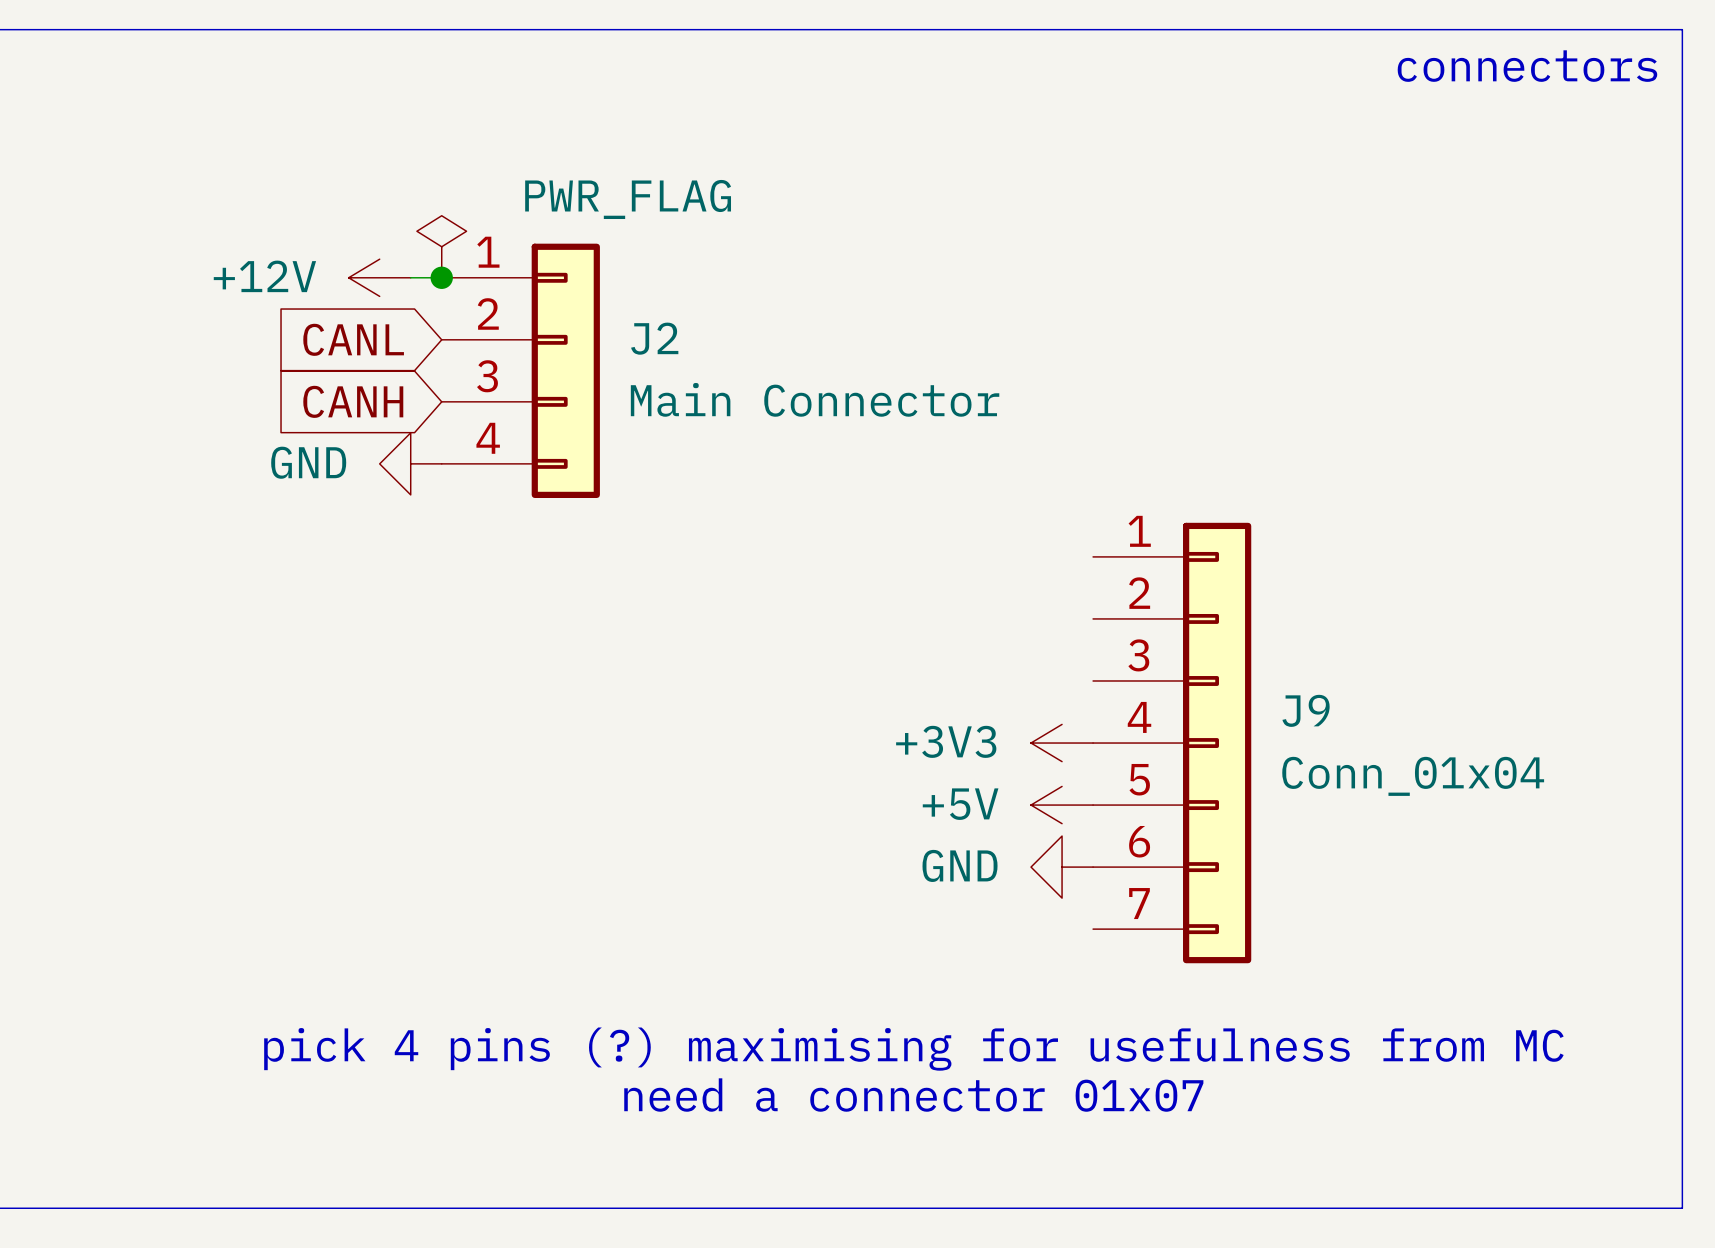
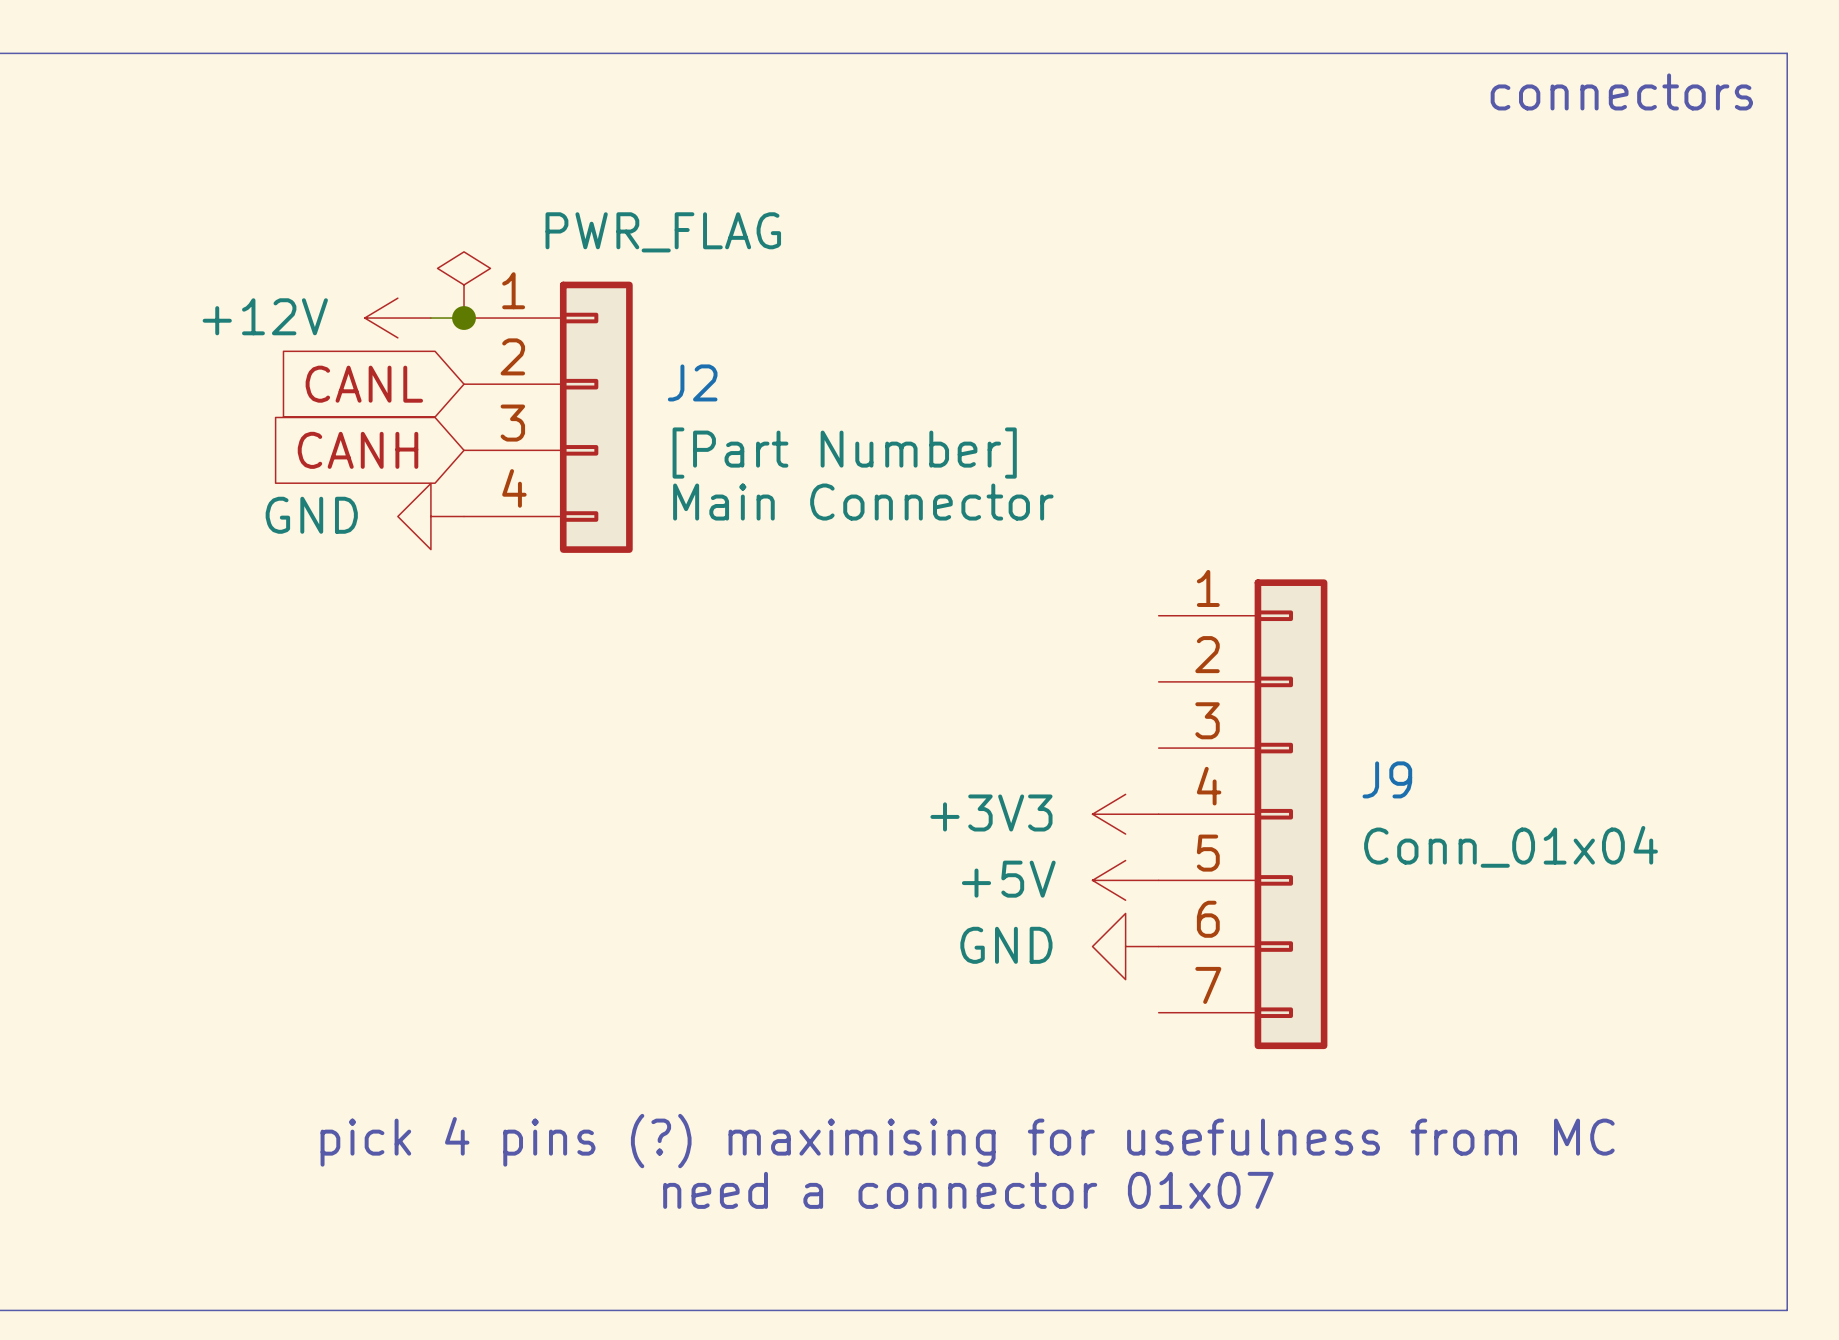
J2 value: Main Connector (815, 399) -> [Part Number] (844, 453)
J2 text: none -> Main Connector (863, 502)

